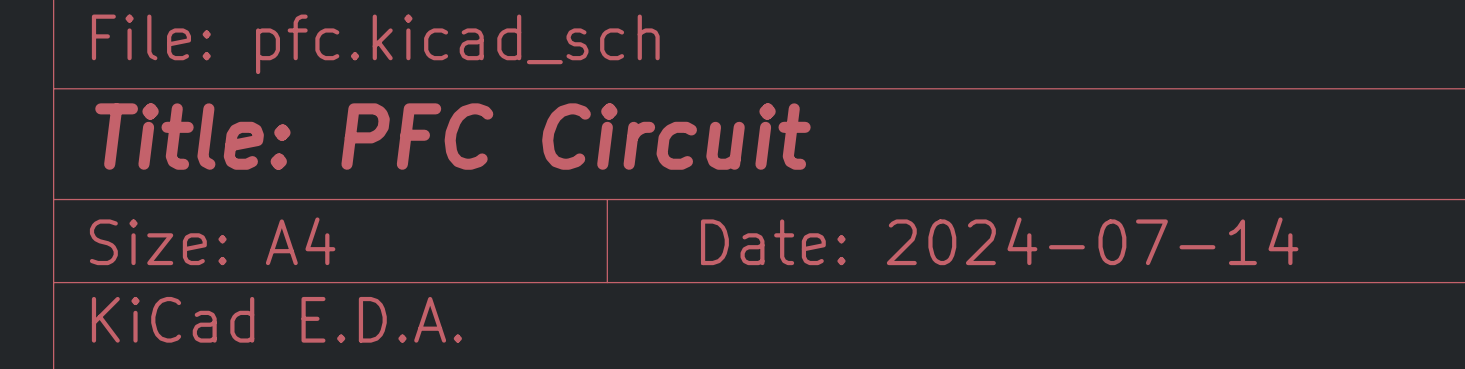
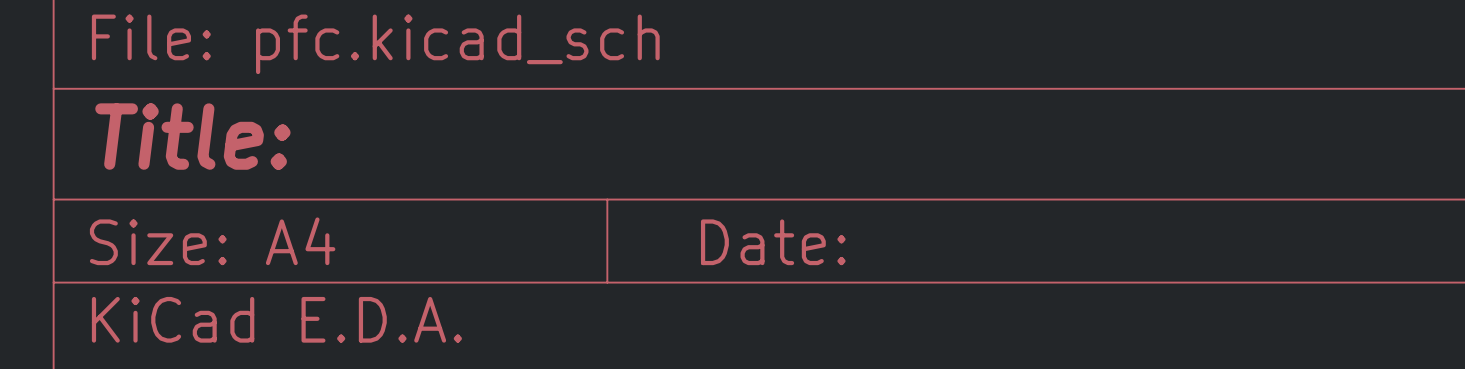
title block: Title: PFC Circuit (452, 136) -> Title: (192, 136)
title block: Date: 2024-07-14 (999, 241) -> Date: (773, 242)

